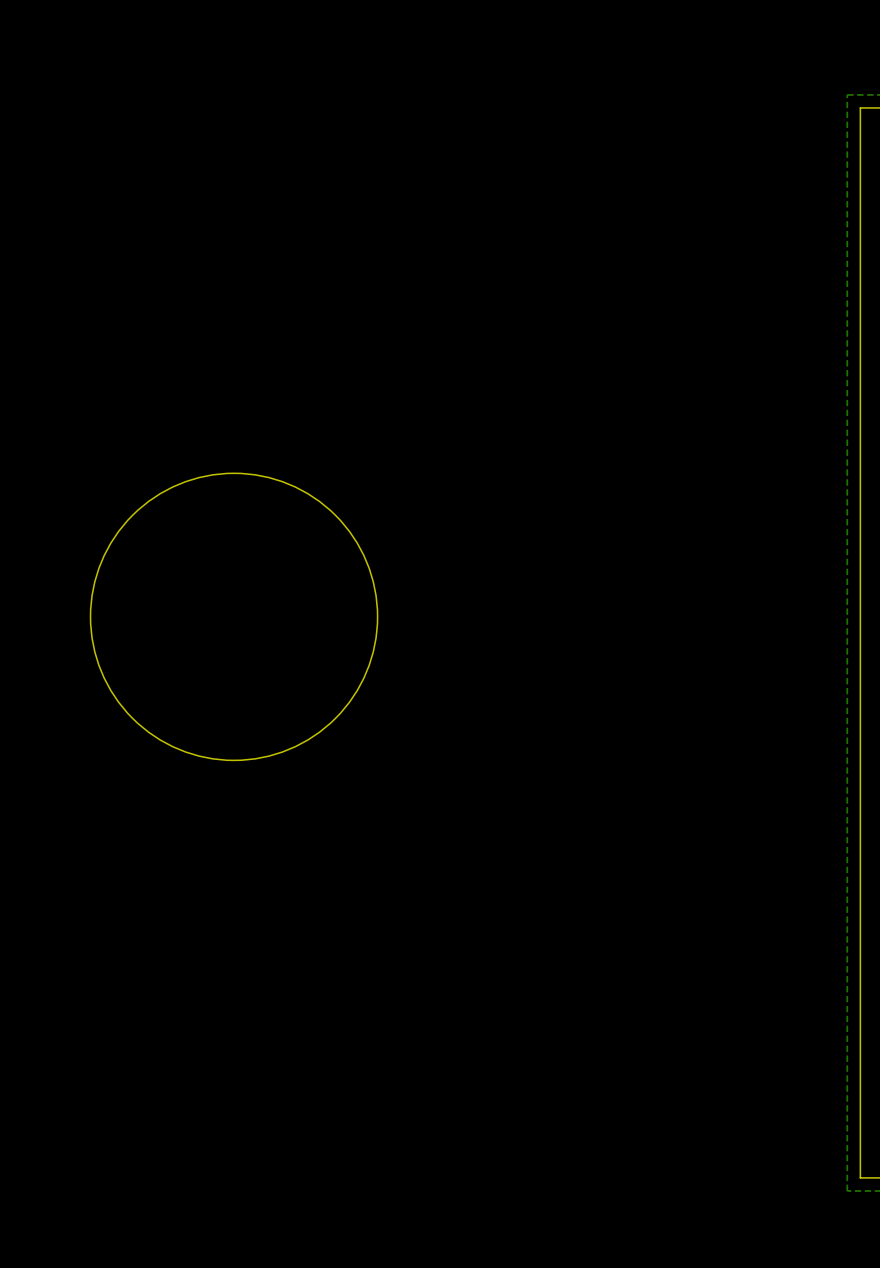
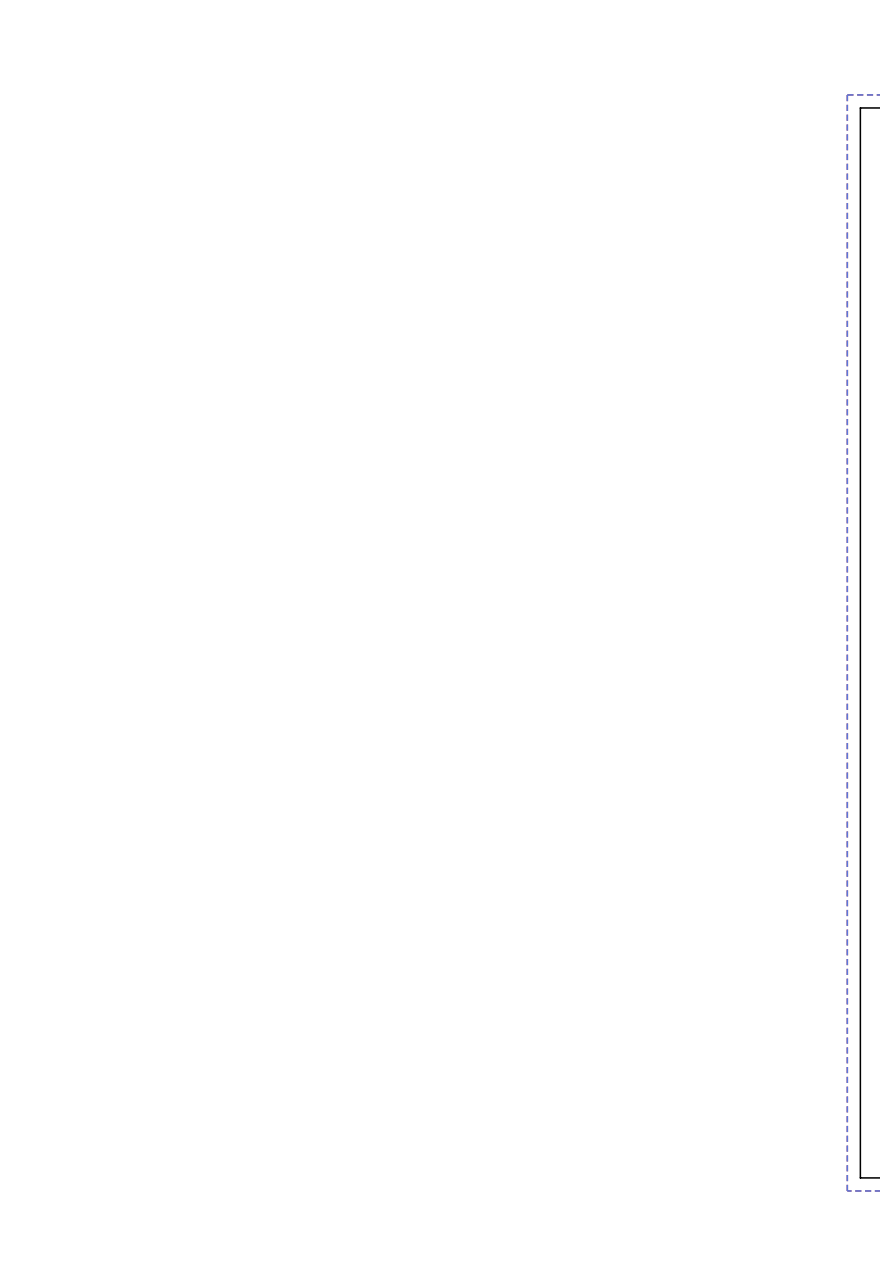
round board edge: [89, 472, 379, 762] -> none

